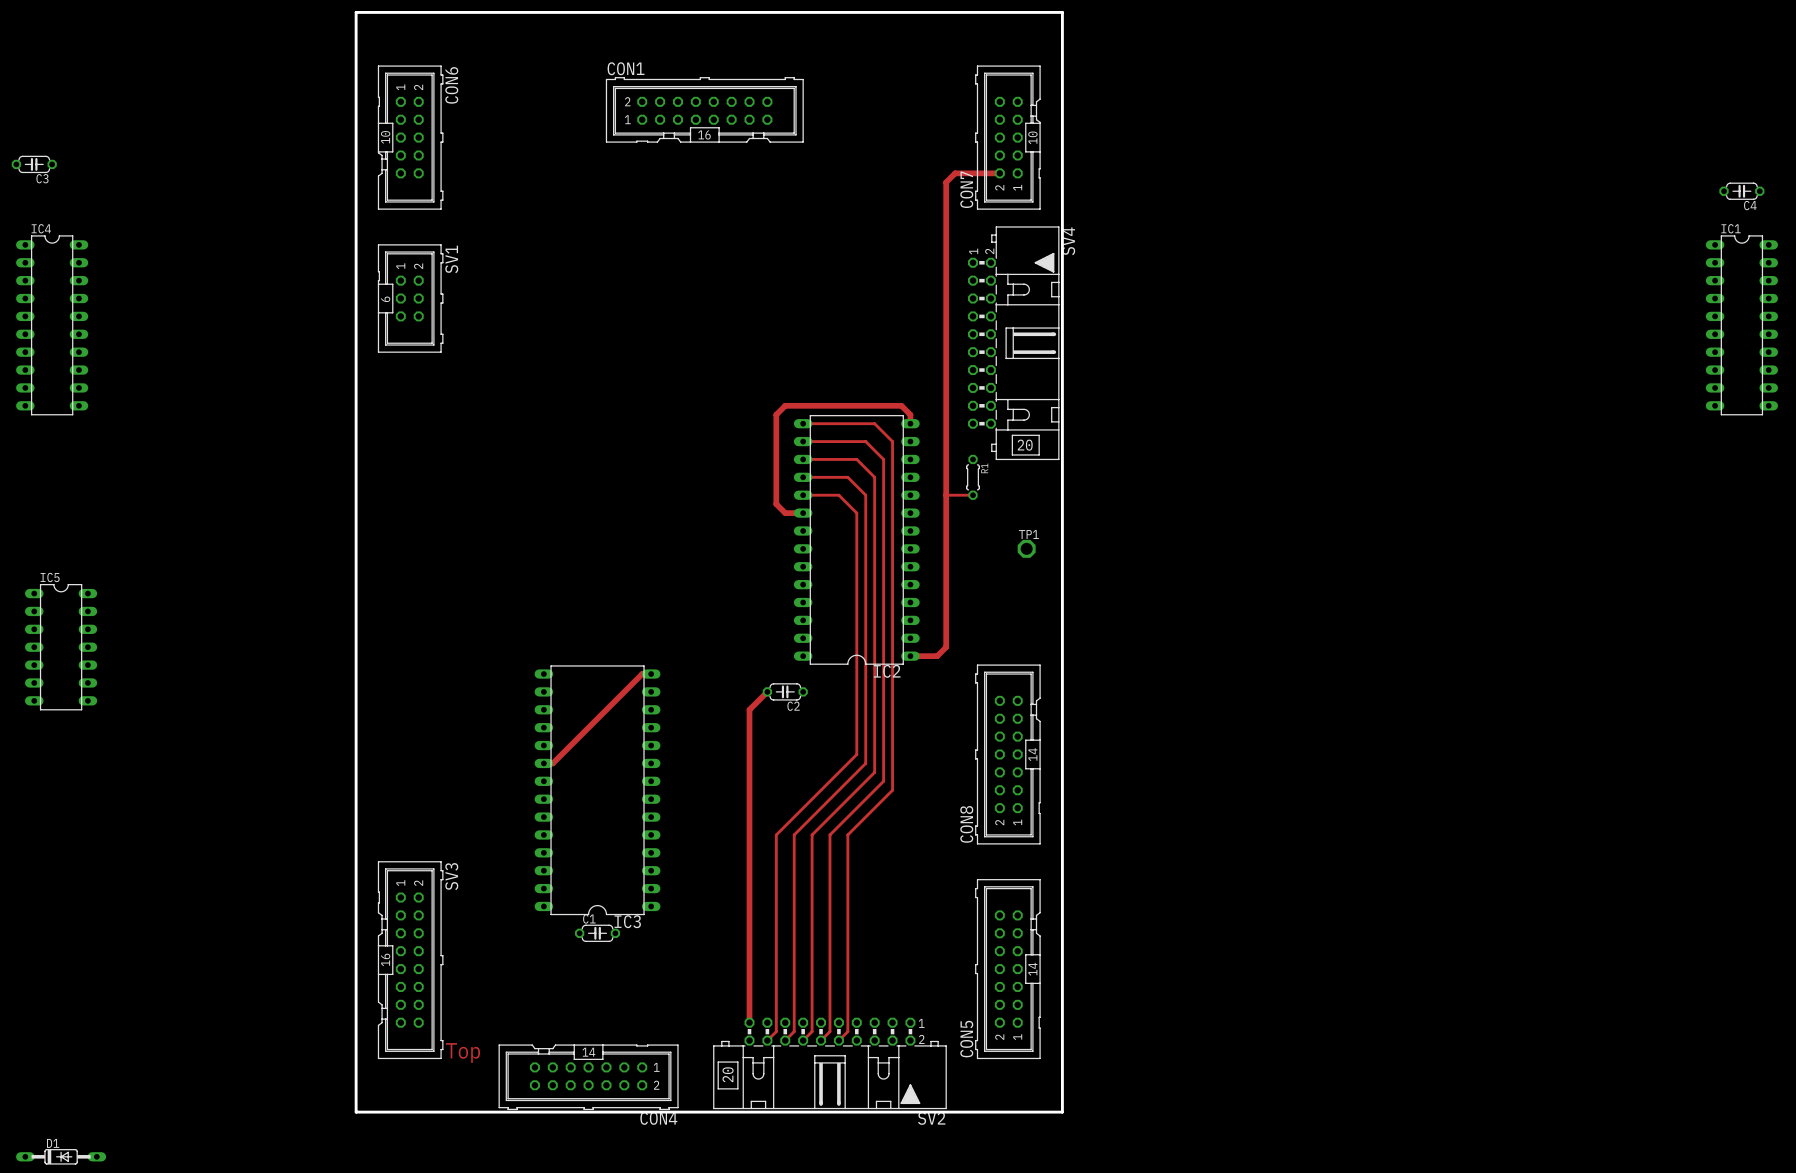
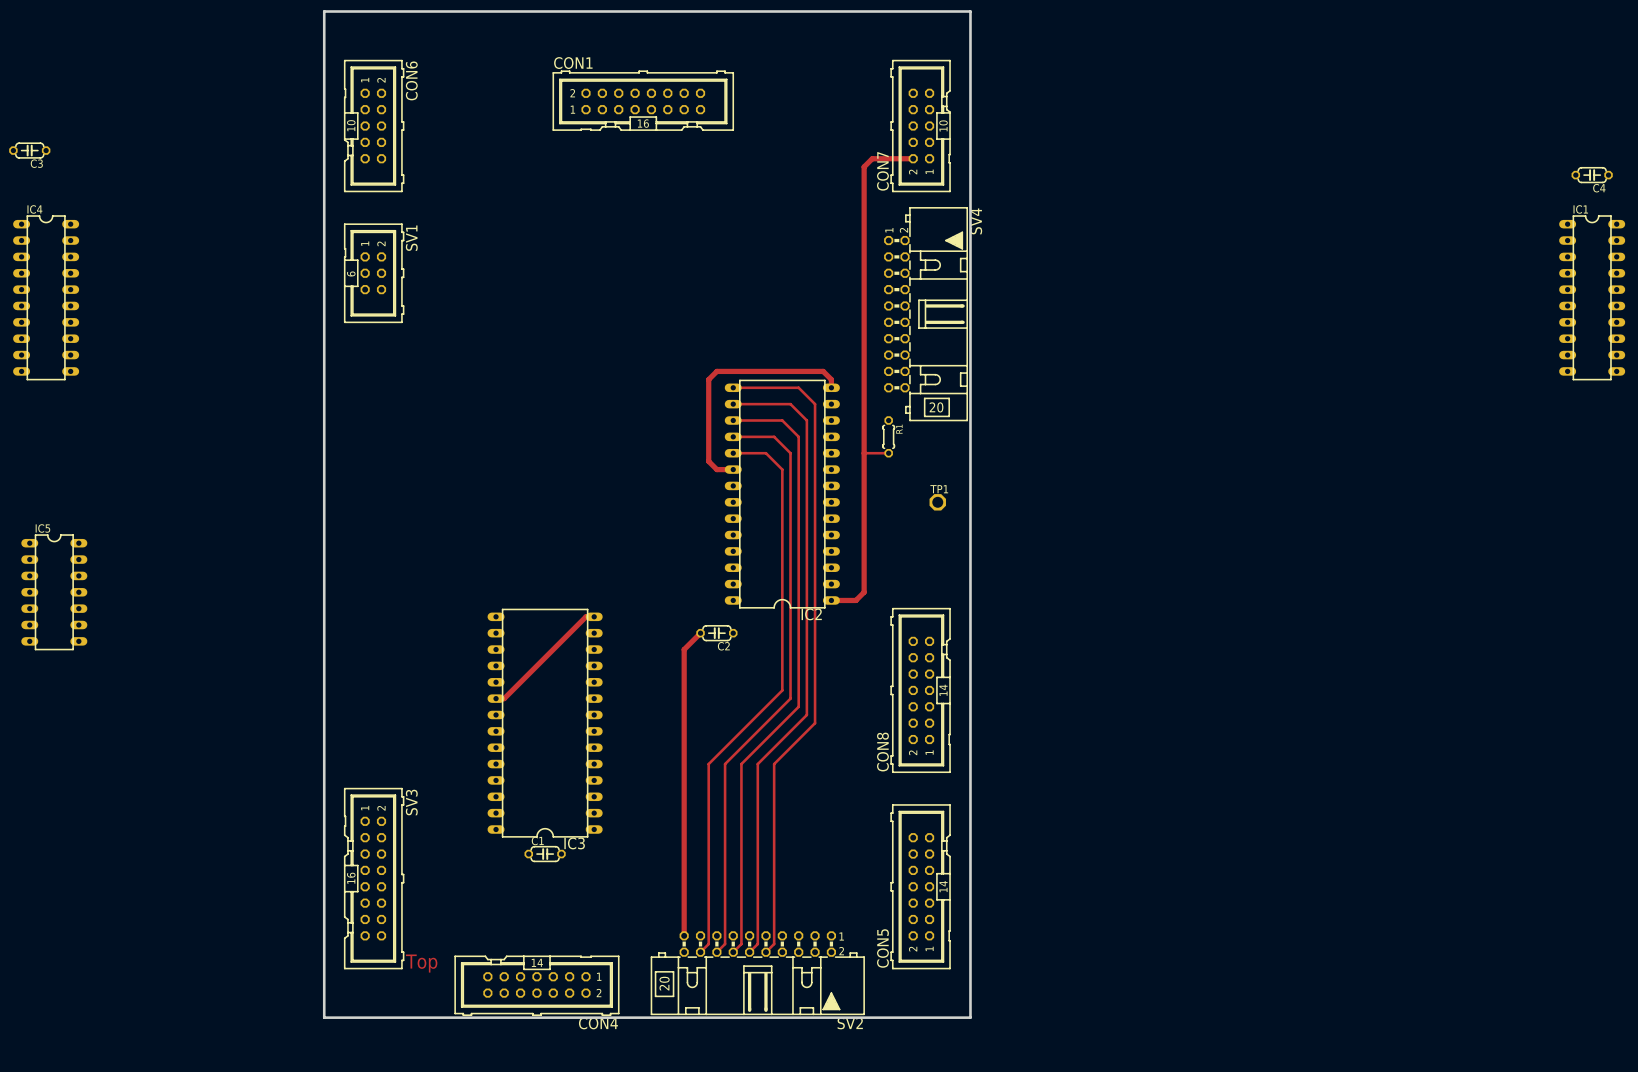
D1: (61, 1156) -> none

